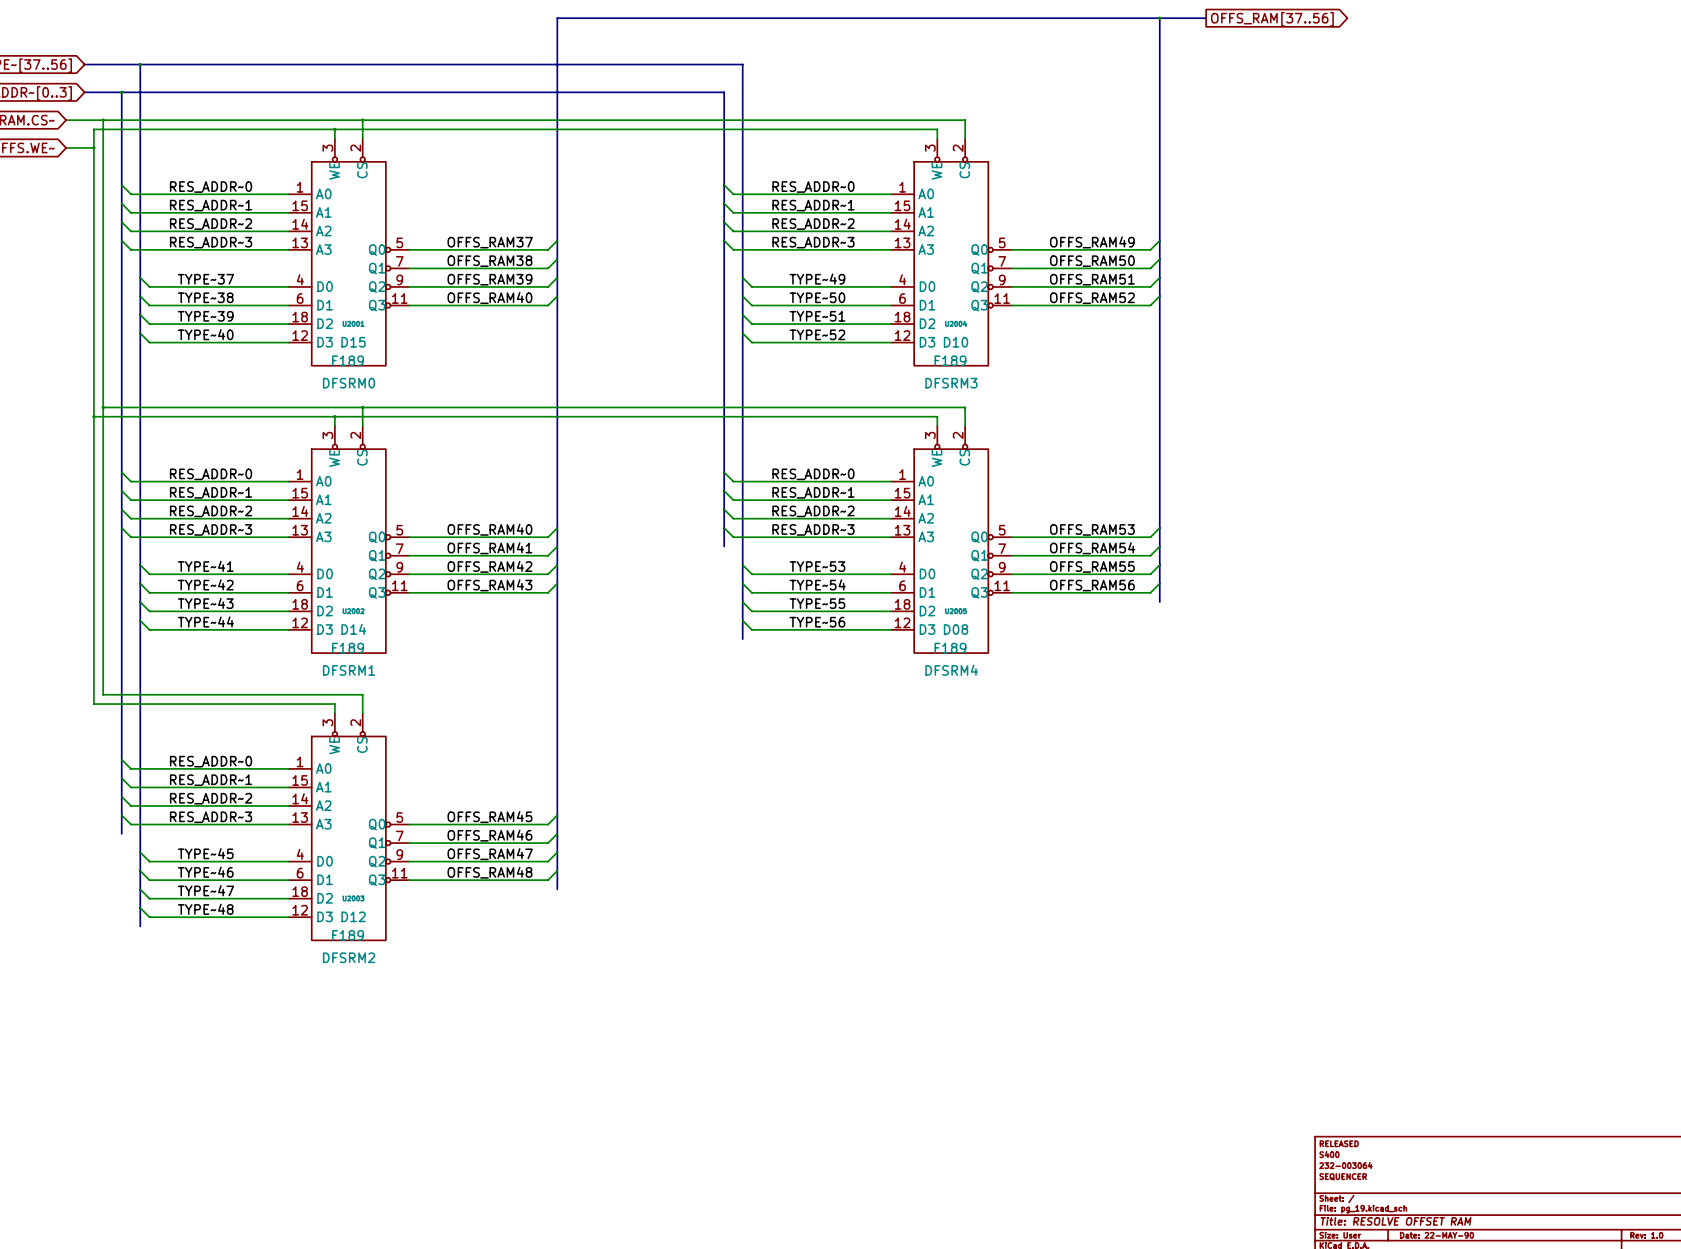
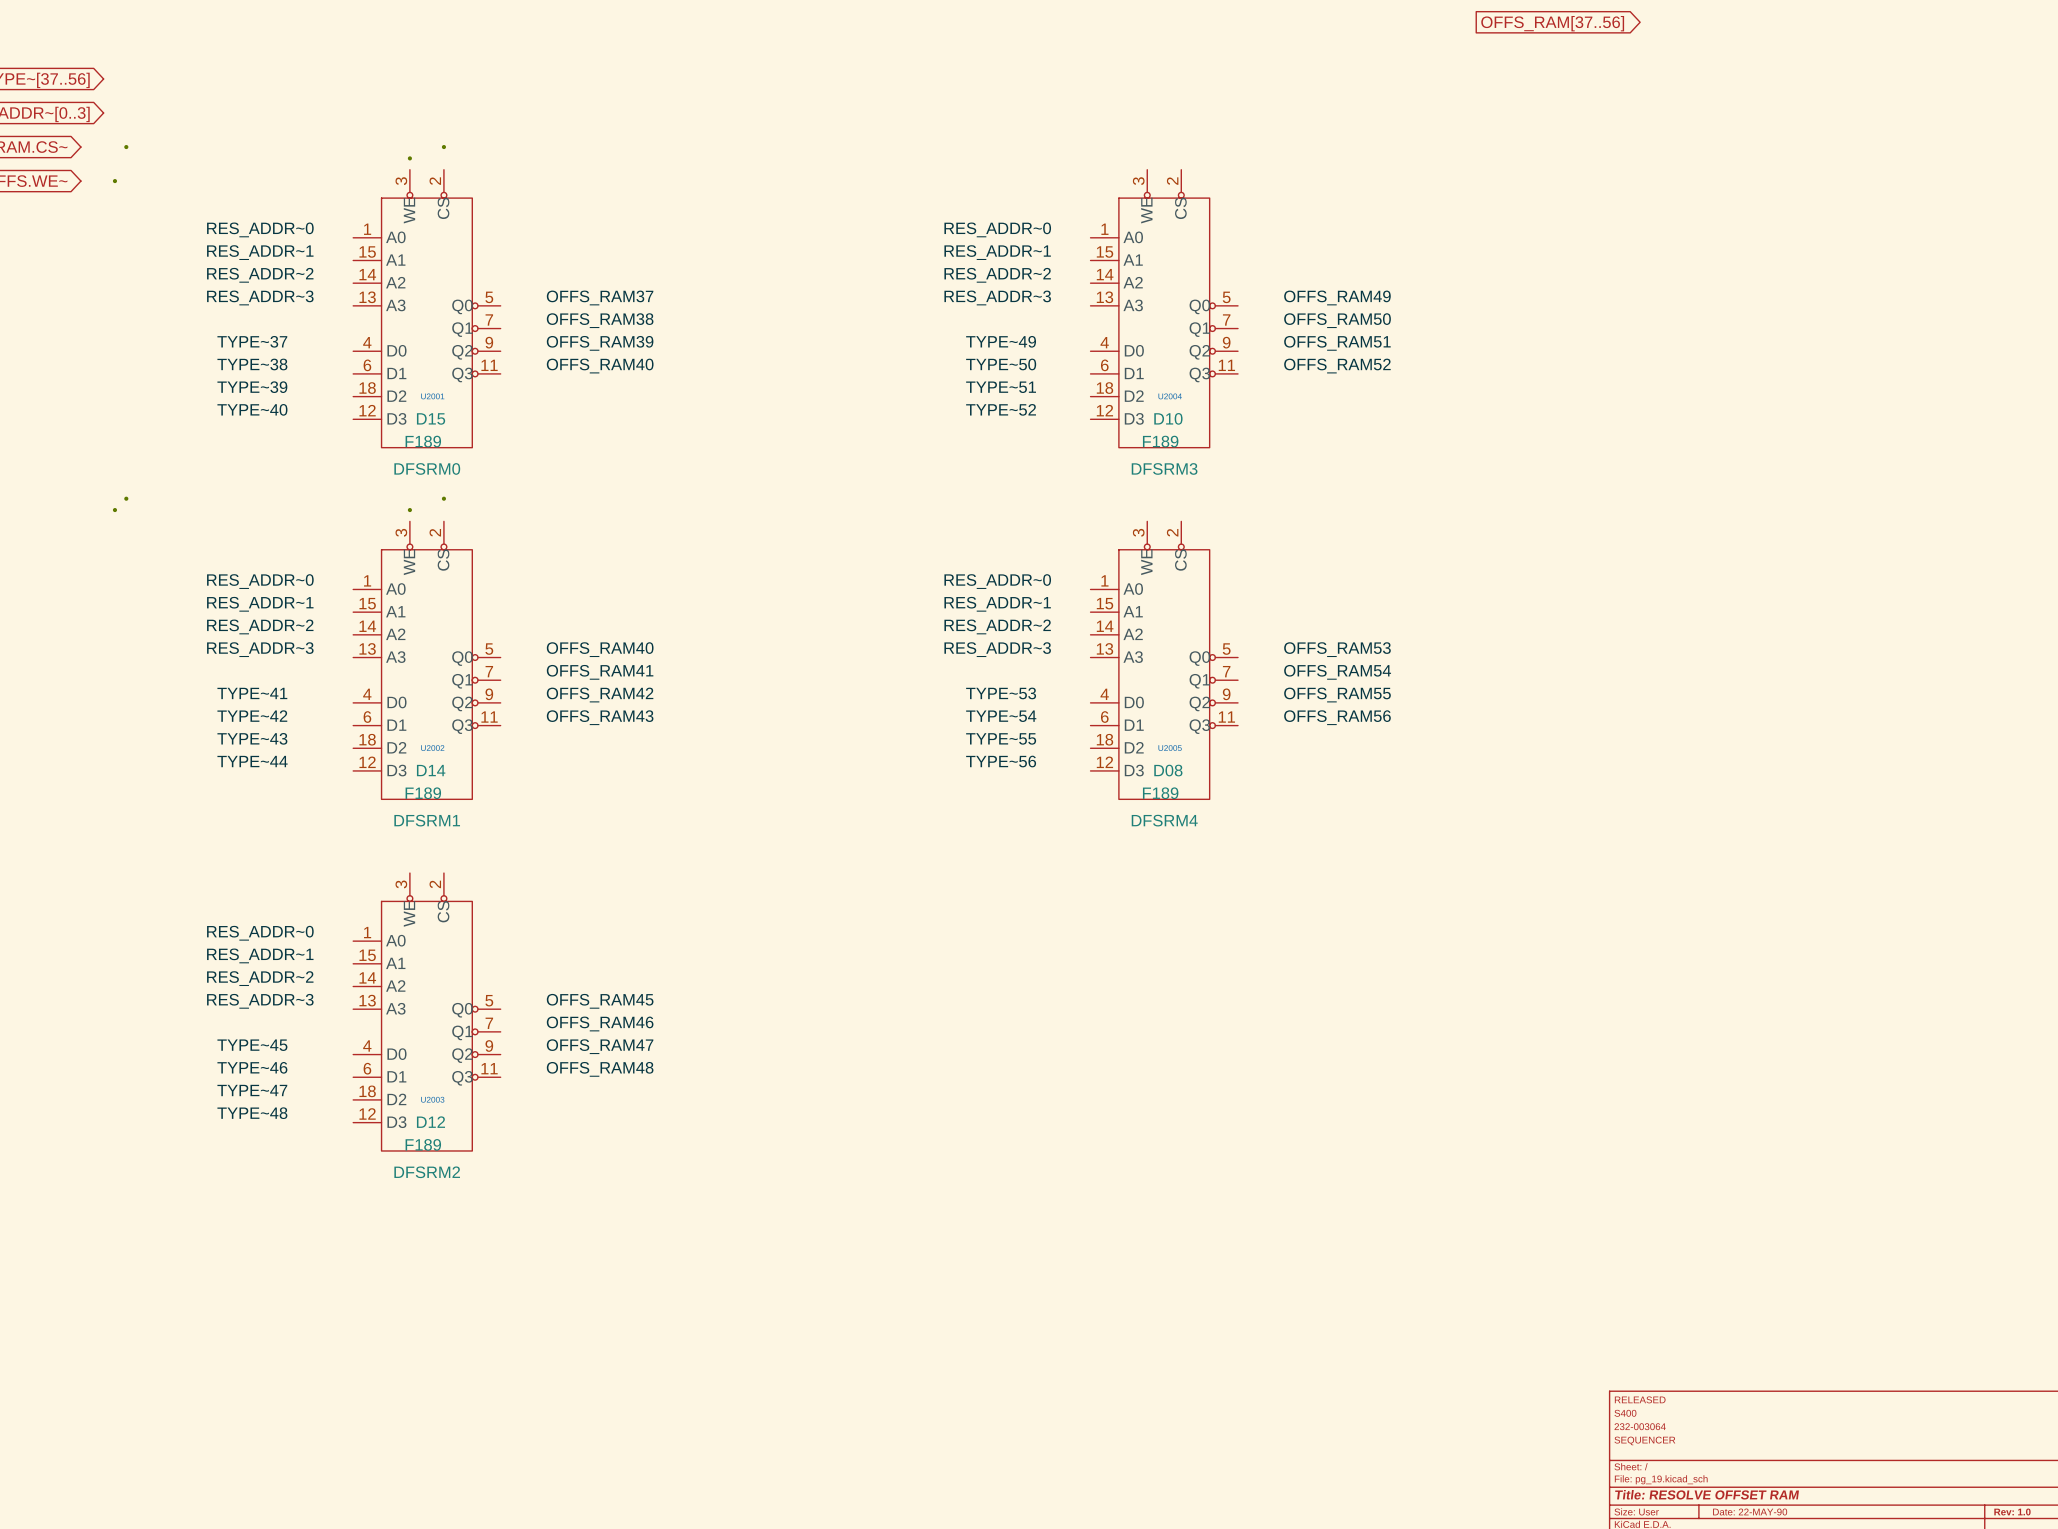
bus: (1159, 18) (1159, 602) -> none
junction: (1159, 18) -> none
bus: (1206, 18) (557, 18) (557, 889) -> none
bus: (84, 64) (742, 64) (742, 639) -> none
bus: (140, 64) (140, 926) -> none
junction: (140, 64) -> none
bus: (84, 92) (724, 92) (724, 546) -> none
bus: (121, 92) (121, 833) -> none
junction: (121, 92) -> none
wire: (66, 120) (965, 120) (965, 138) -> none
wire: (103, 120) (103, 694) (362, 694) (362, 713) -> none
wire: (362, 120) (362, 138) -> none
wire: (334, 129) (334, 138) -> none
wire: (937, 138) (937, 129) (93, 129) (93, 704) (334, 704) (334, 713) -> none
wire: (66, 147) (93, 147) -> none
wire: (121, 185) (131, 194) (288, 194) -> none
wire: (724, 185) (733, 194) (890, 194) -> none
wire: (121, 203) (131, 212) (288, 212) -> none
wire: (724, 203) (733, 212) (890, 212) -> none
wire: (121, 222) (131, 231) (288, 231) -> none
wire: (724, 222) (733, 231) (890, 231) -> none
wire: (121, 240) (131, 249) (288, 249) -> none
wire: (557, 240) (548, 249) (409, 249) -> none
wire: (724, 240) (733, 249) (890, 249) -> none
wire: (1159, 240) (1150, 249) (1011, 249) -> none
wire: (557, 259) (548, 268) (409, 268) -> none
wire: (1159, 259) (1150, 268) (1011, 268) -> none
wire: (140, 277) (149, 286) (288, 286) -> none
wire: (557, 277) (548, 286) (409, 286) -> none
wire: (742, 277) (751, 286) (890, 286) -> none
wire: (1159, 277) (1150, 286) (1011, 286) -> none
wire: (140, 296) (149, 305) (288, 305) -> none
wire: (557, 296) (548, 305) (409, 305) -> none
wire: (742, 296) (751, 305) (890, 305) -> none
wire: (1159, 296) (1150, 305) (1011, 305) -> none
wire: (140, 314) (149, 324) (288, 324) -> none
wire: (742, 314) (751, 324) (890, 324) -> none
wire: (140, 333) (149, 342) (288, 342) -> none
wire: (742, 333) (751, 342) (890, 342) -> none
wire: (103, 407) (965, 407) (965, 425) -> none
wire: (362, 407) (362, 425) -> none
wire: (93, 416) (937, 416) (937, 425) -> none
wire: (334, 416) (334, 425) -> none
wire: (121, 472) (131, 481) (288, 481) -> none
wire: (724, 472) (733, 481) (890, 481) -> none
wire: (121, 490) (131, 500) (288, 500) -> none
wire: (724, 490) (733, 500) (890, 500) -> none
wire: (121, 509) (131, 518) (288, 518) -> none
wire: (724, 509) (733, 518) (890, 518) -> none
wire: (121, 527) (131, 537) (288, 537) -> none
wire: (557, 527) (548, 537) (409, 537) -> none
wire: (724, 527) (733, 537) (890, 537) -> none
wire: (1159, 527) (1150, 537) (1011, 537) -> none
wire: (557, 546) (548, 555) (409, 555) -> none
wire: (1159, 546) (1150, 555) (1011, 555) -> none
wire: (140, 565) (149, 574) (288, 574) -> none
wire: (557, 565) (548, 574) (409, 574) -> none
wire: (742, 565) (751, 574) (890, 574) -> none
wire: (1159, 565) (1150, 574) (1011, 574) -> none
wire: (140, 583) (149, 592) (288, 592) -> none
wire: (557, 583) (548, 592) (409, 592) -> none
wire: (742, 583) (751, 592) (890, 592) -> none
wire: (1159, 583) (1150, 592) (1011, 592) -> none
wire: (140, 602) (149, 611) (288, 611) -> none
wire: (742, 602) (751, 611) (890, 611) -> none
wire: (140, 620) (149, 629) (288, 629) -> none
wire: (742, 620) (751, 629) (890, 629) -> none
wire: (121, 759) (131, 768) (288, 768) -> none
wire: (121, 778) (131, 787) (288, 787) -> none
wire: (121, 796) (131, 805) (288, 805) -> none
wire: (121, 815) (131, 824) (288, 824) -> none
wire: (557, 815) (548, 824) (409, 824) -> none
wire: (557, 833) (548, 843) (409, 843) -> none
wire: (140, 852) (149, 861) (288, 861) -> none
wire: (557, 852) (548, 861) (409, 861) -> none
wire: (140, 870) (149, 880) (288, 880) -> none
wire: (557, 870) (548, 880) (409, 880) -> none
wire: (140, 889) (149, 898) (288, 898) -> none
wire: (140, 907) (149, 917) (288, 917) -> none

